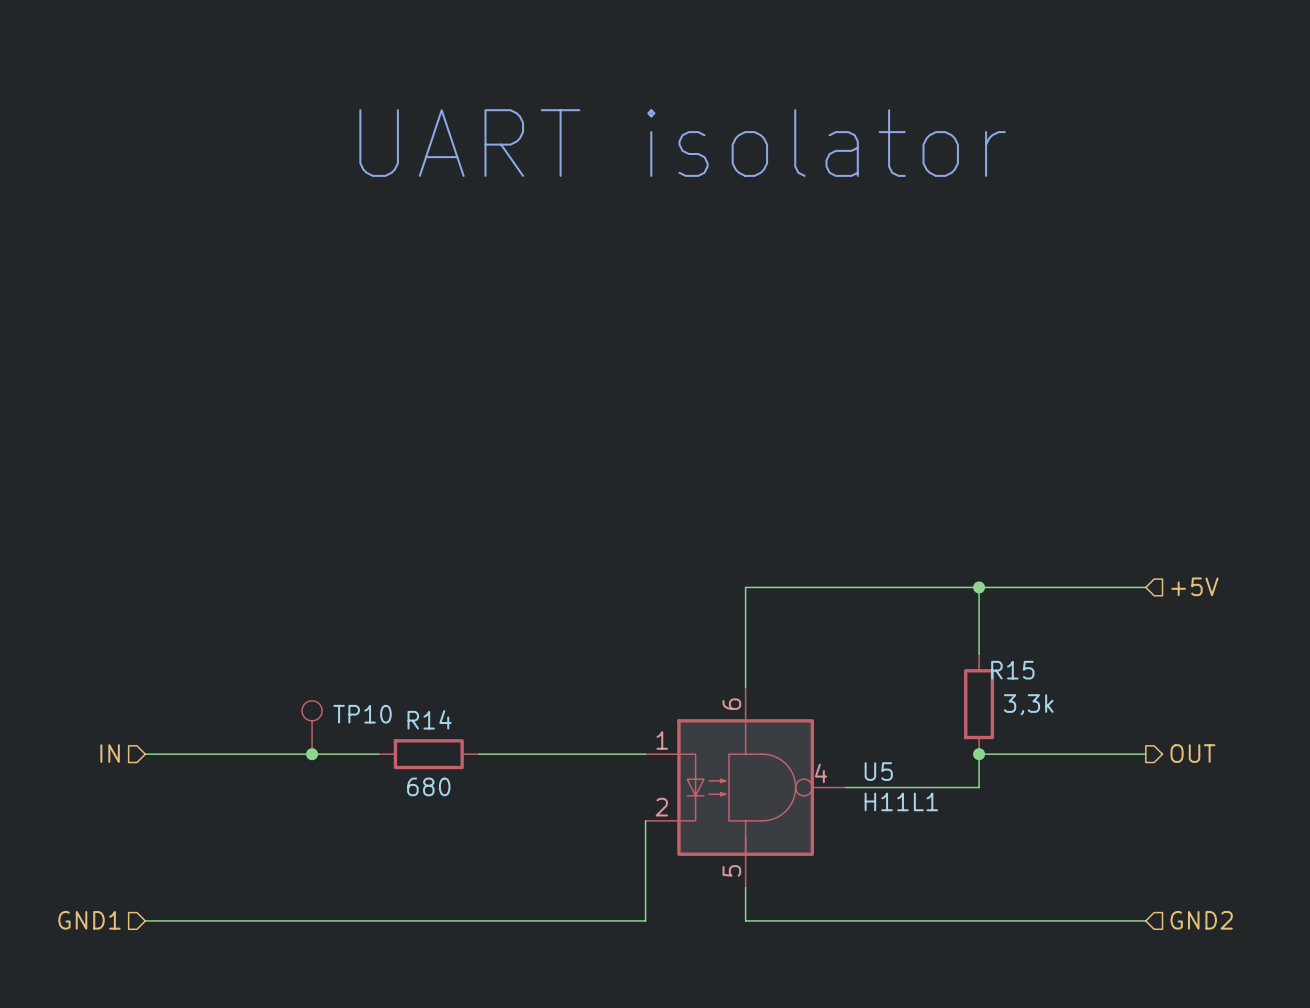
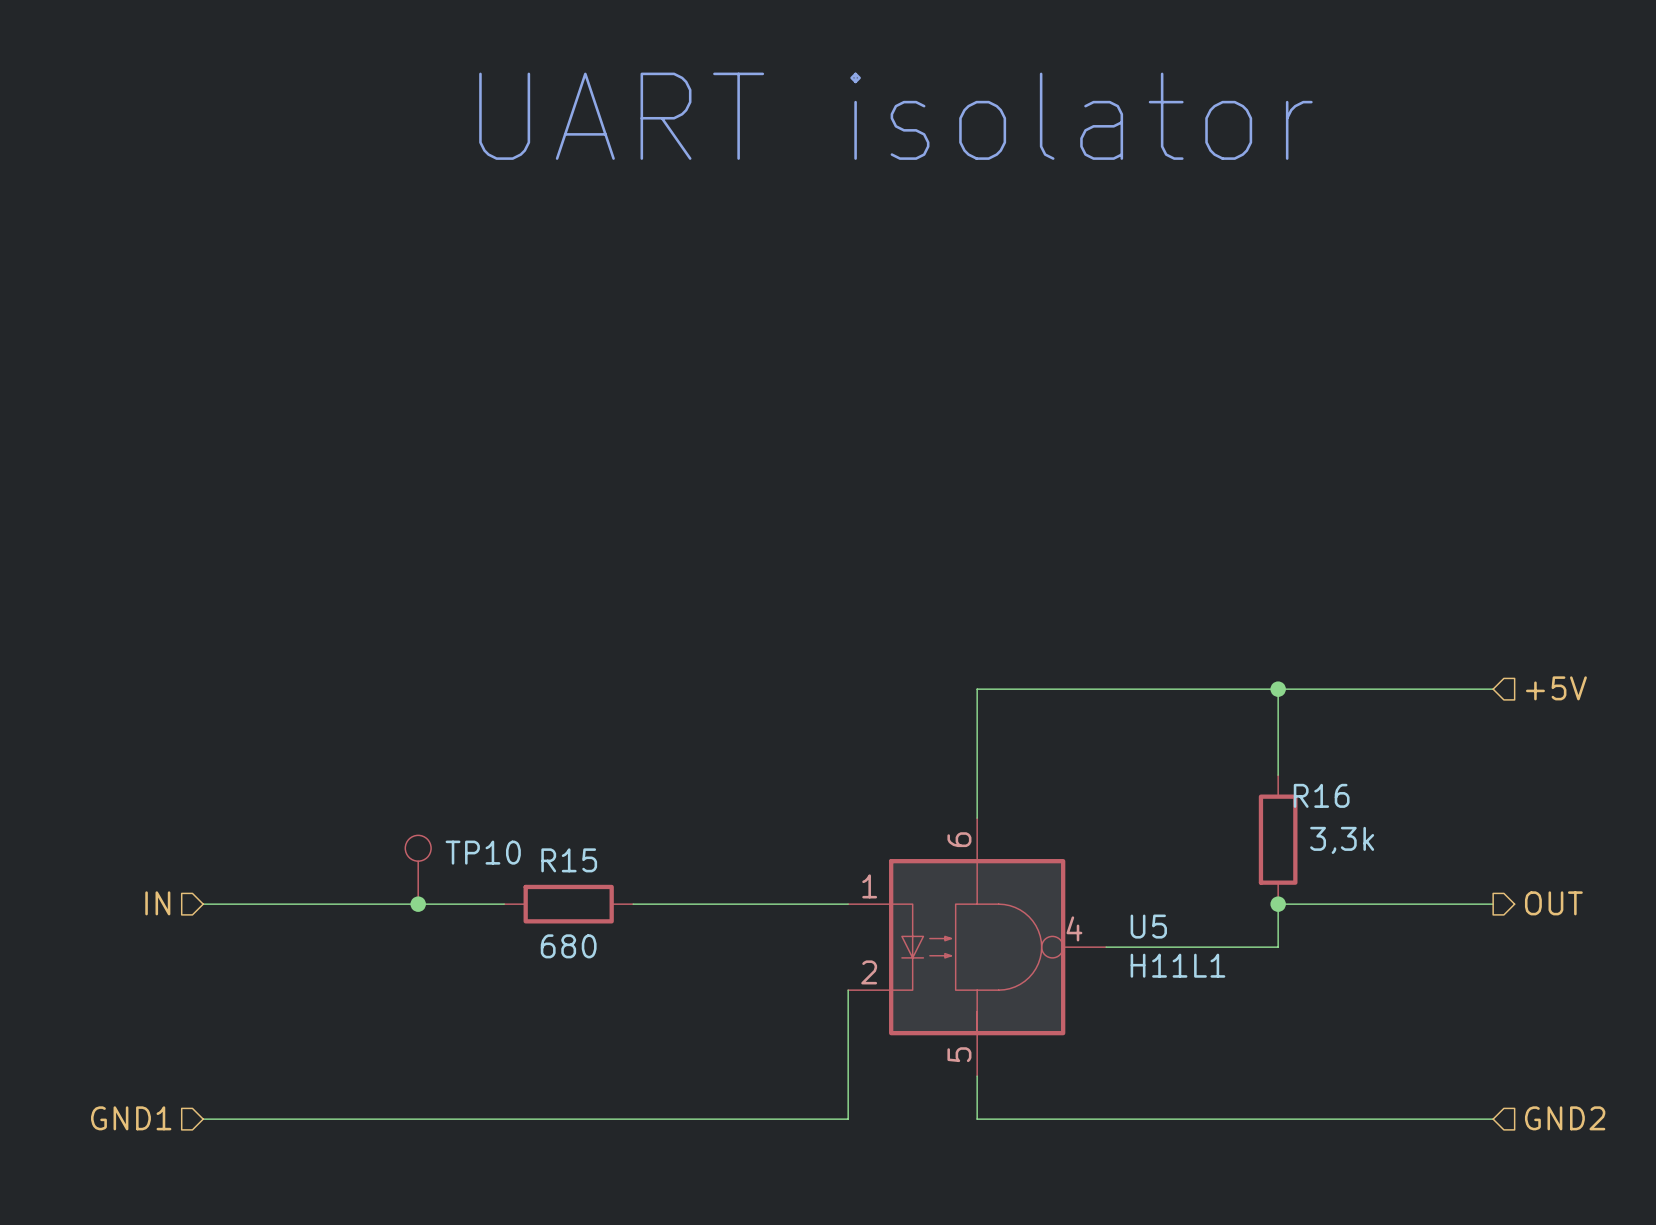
R15 name: R15 (1012, 670) -> R16 (1321, 795)
R14 name: R14 (429, 719) -> R15 (569, 860)

